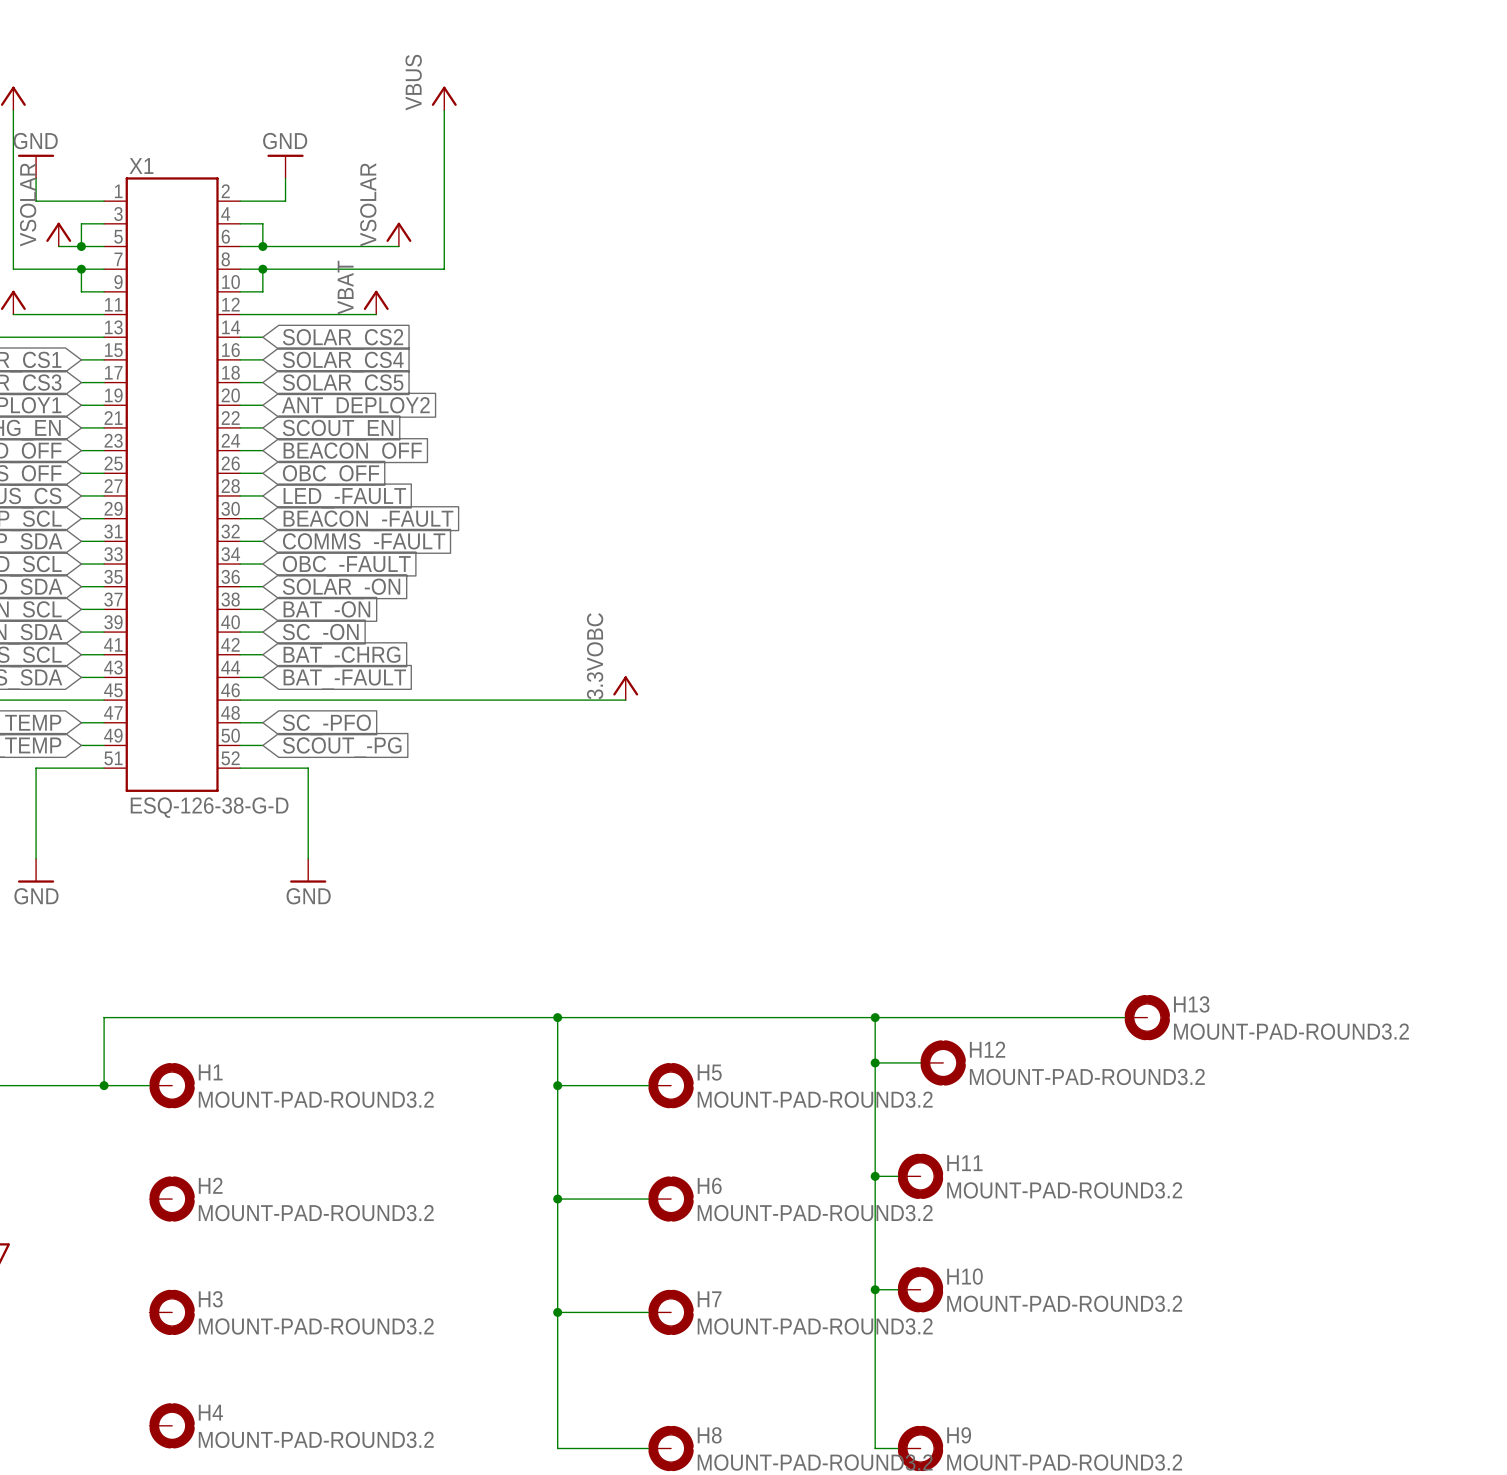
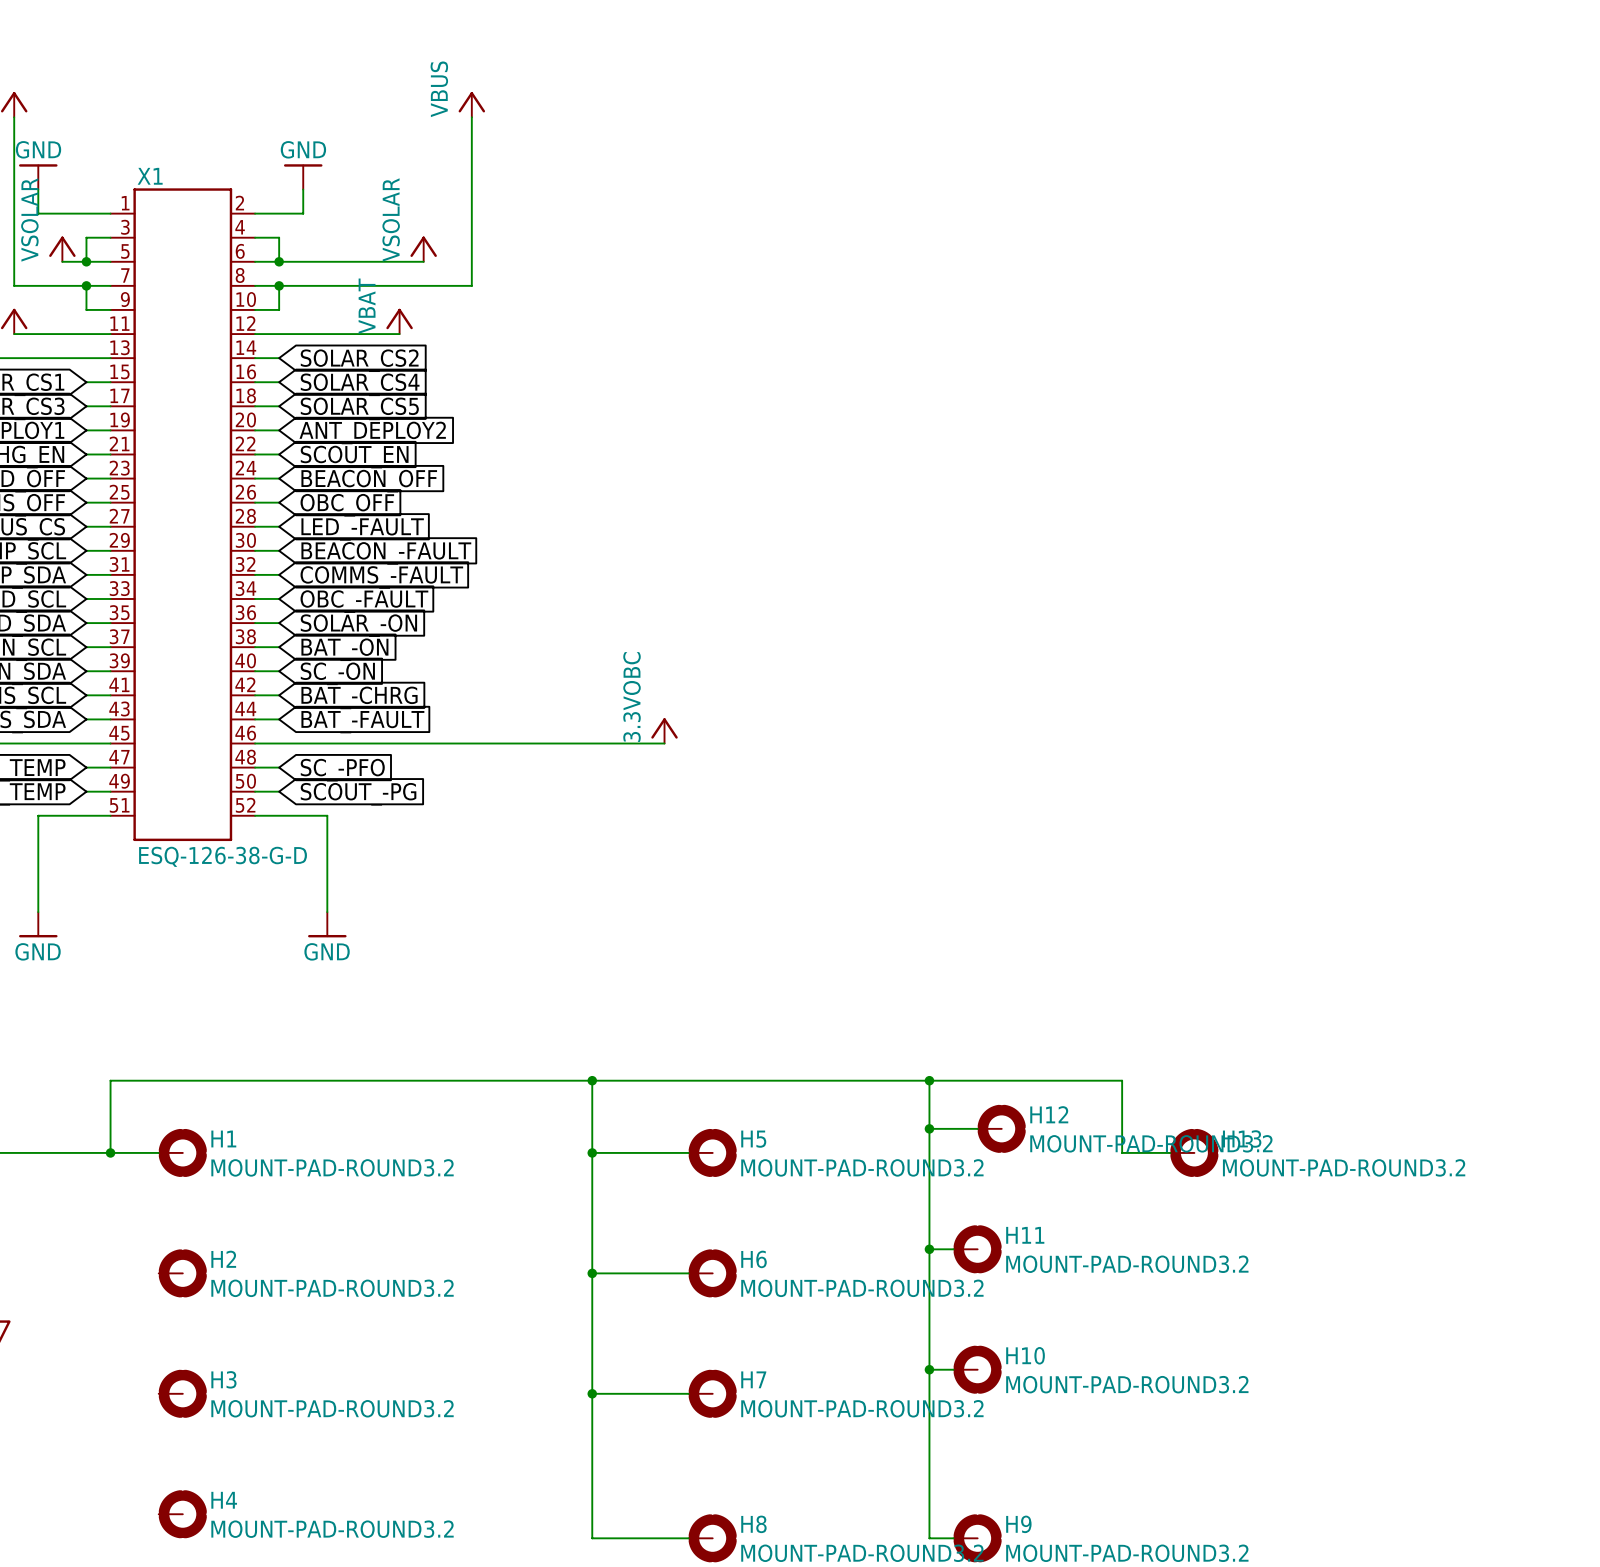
wire: (1056, 1017) (1124, 1017) -> (1122, 1080) (1122, 1152) (1170, 1152)
H13 position: (1147, 1017) -> (1194, 1152)

